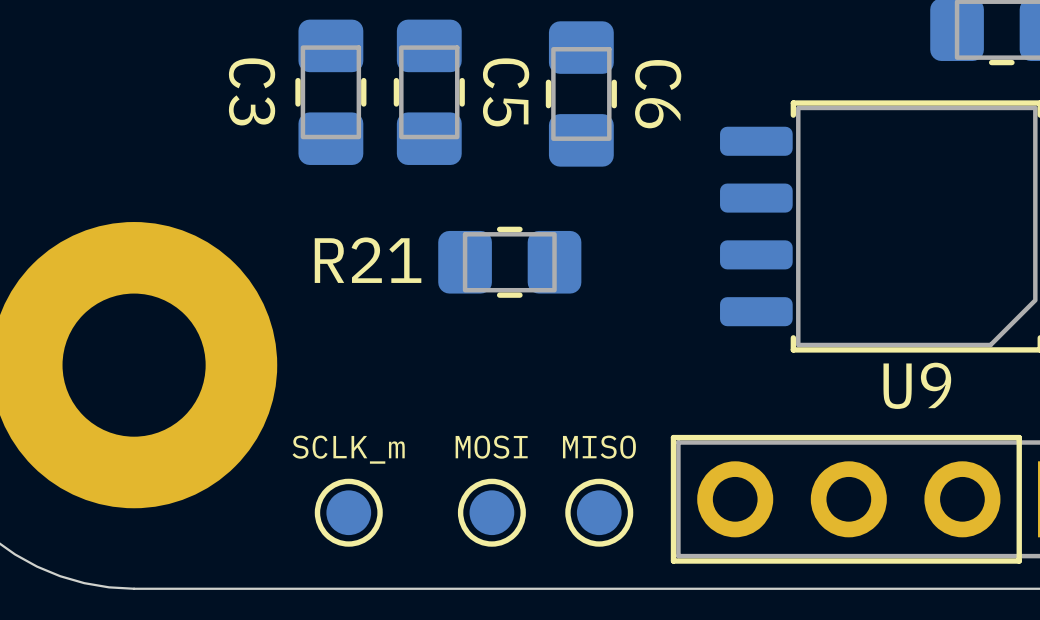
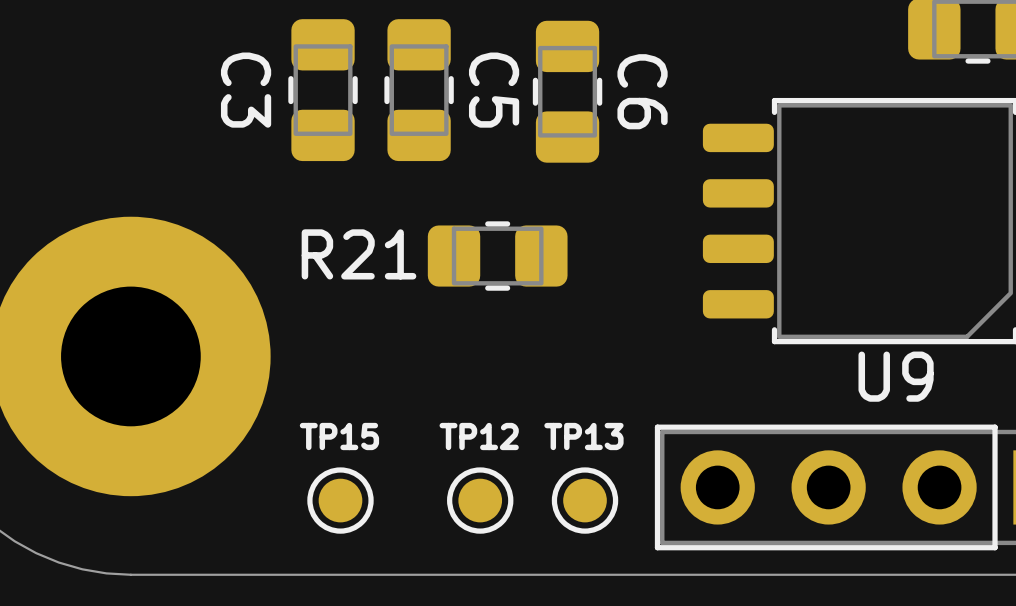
MOSI name: MOSI (491, 447) -> TP12 (479, 436)
MISO name: MISO (599, 447) -> TP13 (583, 436)
SCLK_m name: SCLK_m (348, 449) -> TP15 (339, 436)

